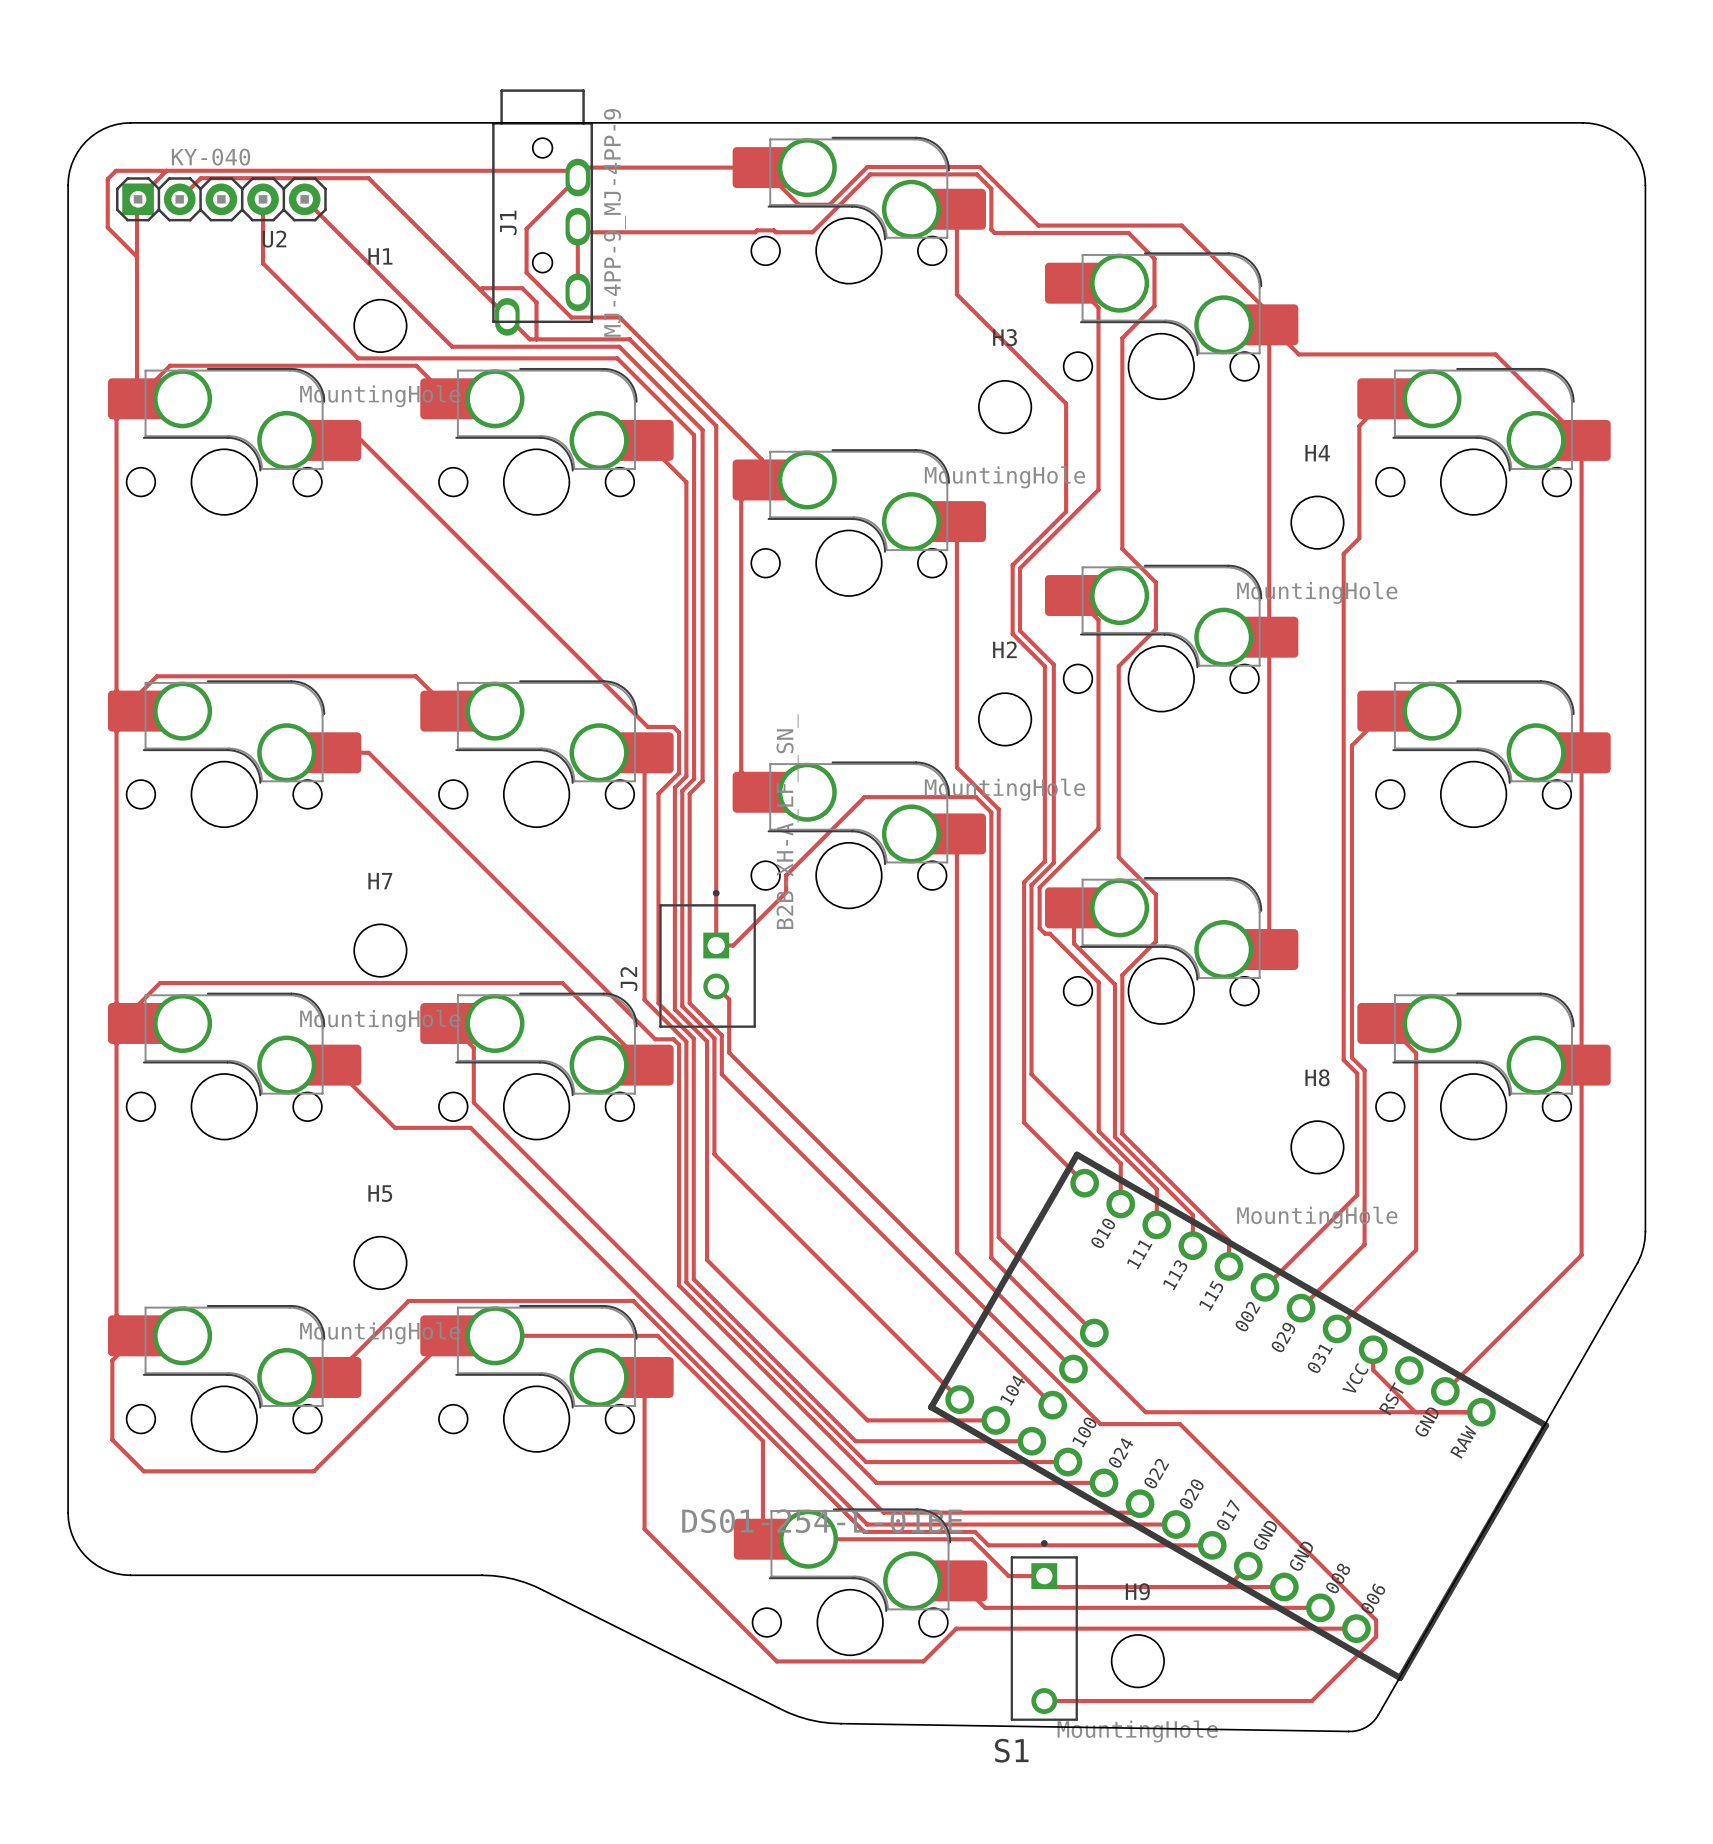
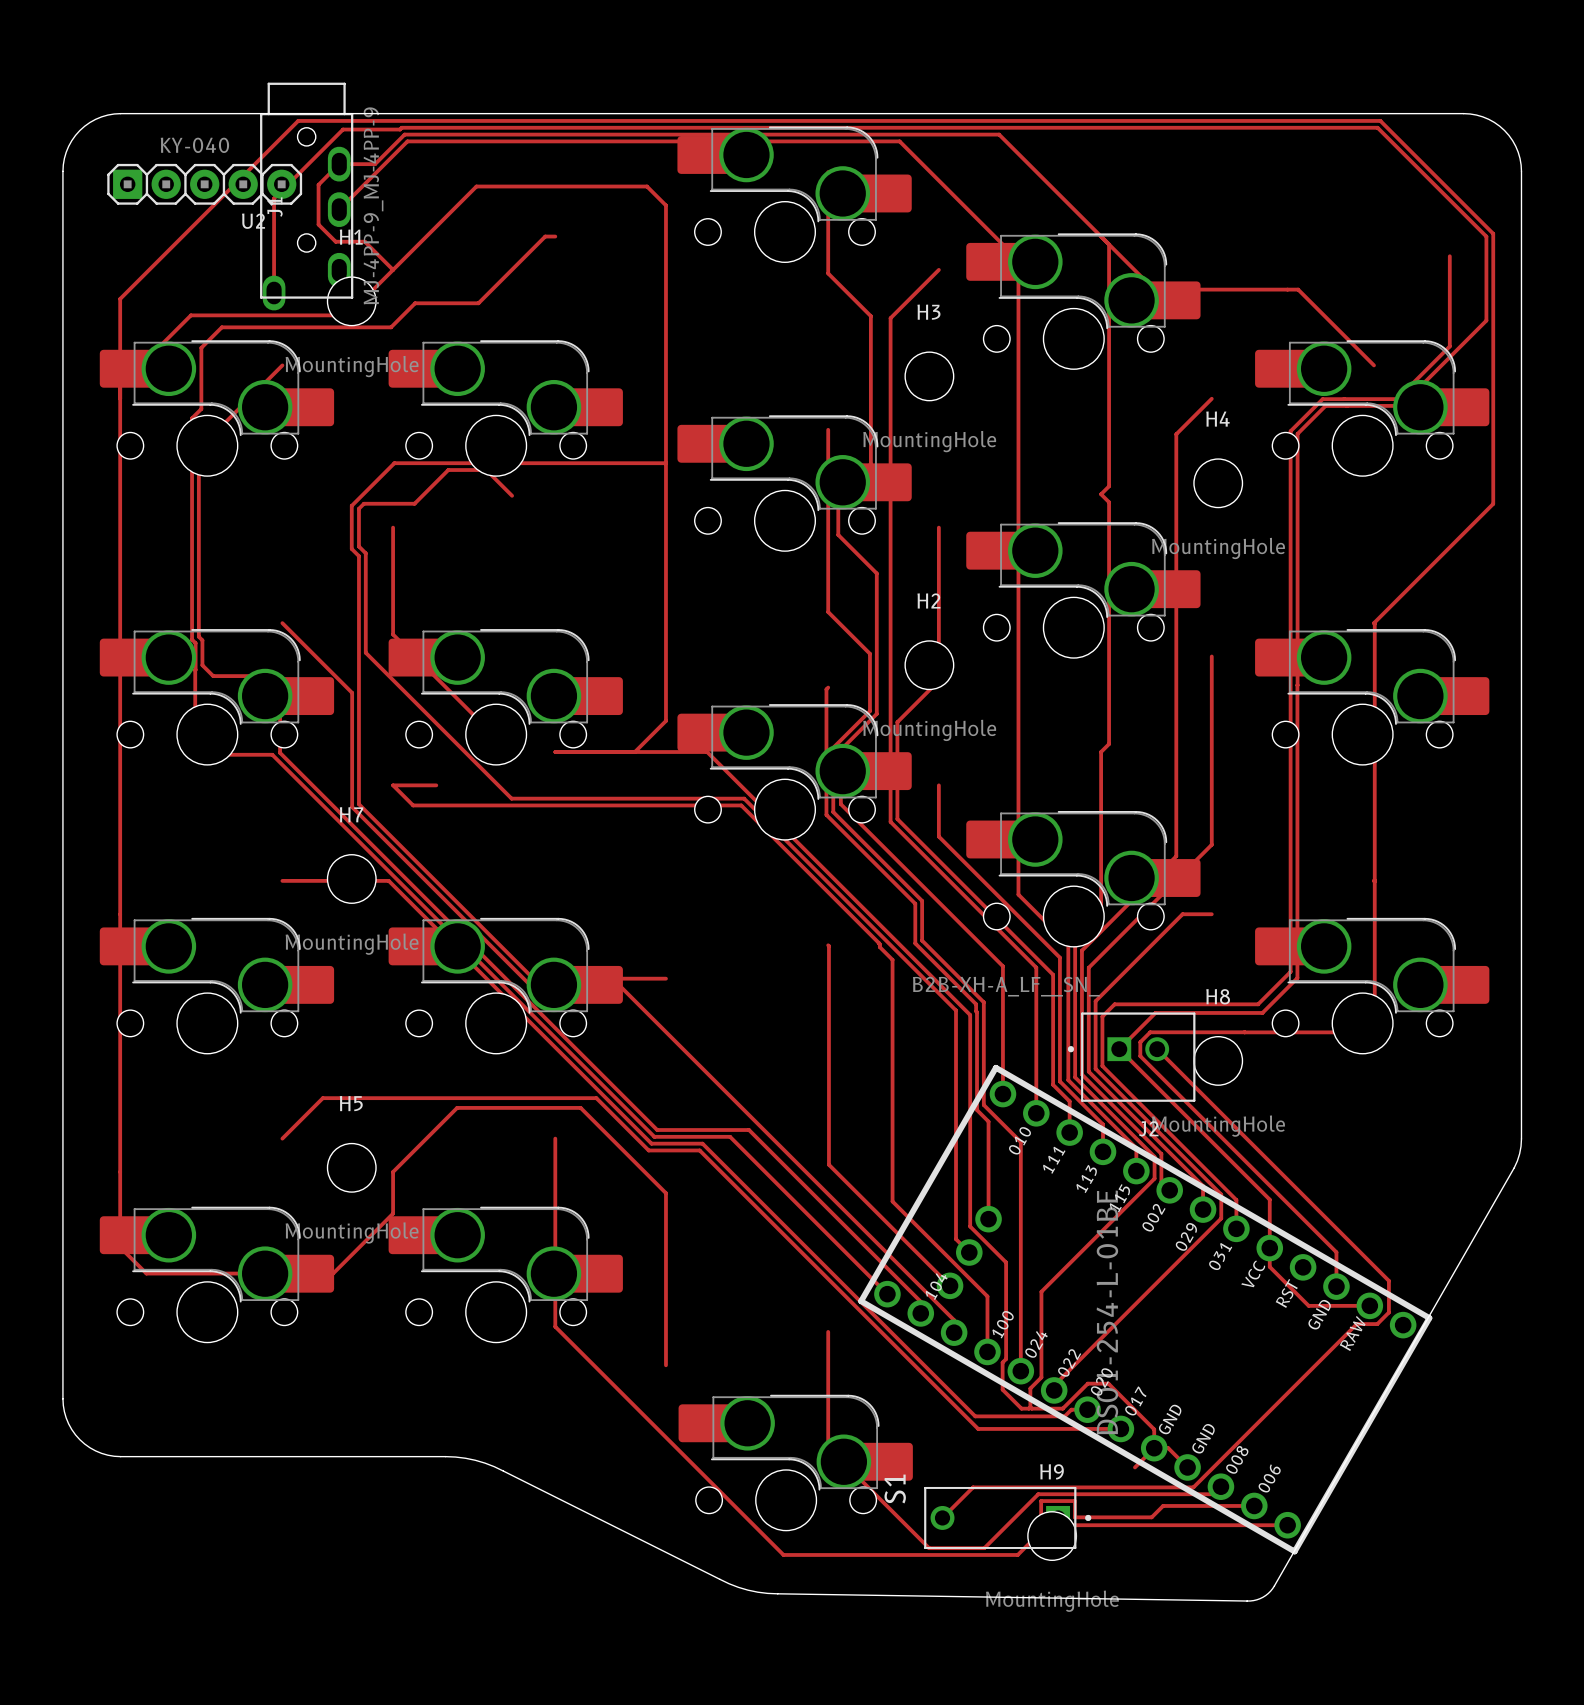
track: (166, 170) (137, 200) (137, 398) -> none
track: (577, 177) (571, 170) (116, 170) (107, 179) (107, 227) (137, 256) -> none
track: (179, 199) (200, 178) (368, 178) (529, 339) (629, 339) (716, 425) (716, 945) (733, 945) (786, 892) (786, 875) (864, 797) (976, 797) (991, 812) (991, 1257) (1145, 1412) (1415, 1412) -> none
track: (263, 199) (263, 263) (358, 358) (617, 358) (694, 435) (694, 778) (682, 790) (682, 1006) (714, 1038) (714, 1154) (789, 1229) -> (555, 236) (545, 236) (478, 303) (415, 303) (391, 327) (221, 327) (201, 347) (201, 409) (192, 418) (192, 639) (195, 643) (195, 733) (216, 754) (272, 754) (654, 1136) (730, 1136)
track: (304, 199) (452, 346) (619, 346) (702, 430) (702, 780) (689, 793) (689, 1003) (721, 1035) (721, 1074) (1052, 1405) -> none
track: (956, 209) (956, 294) (1066, 403) (1066, 511) (1012, 565) (1012, 633) (1044, 666) (1044, 861) (1024, 882) (1024, 1122) (1084, 1183) -> (828, 172) (828, 273) (870, 316) (870, 463) (838, 496) (838, 534) (876, 573) (876, 713) (840, 749) (840, 804) (1002, 966) (1002, 1094)
J1 position: (542, 212) -> (306, 196)
track: none -> (1109, 244) (1109, 486) (1101, 494) (1109, 502) (1109, 744) (1101, 752) (1101, 908) (1075, 934) (1075, 1077) (1154, 1156) (1154, 1178) (1041, 1291) (1041, 1377) (1030, 1388) (1030, 1407)
track: (1074, 283) (1098, 307) (1098, 489) (1020, 568) (1020, 630) (1053, 664) (1053, 862) (1031, 885) (1031, 1074) (1120, 1163) -> (938, 269) (890, 318) (890, 821) (1036, 967) (1036, 1075)
track: (480, 289) (482, 288) (522, 288) (536, 302) (536, 339) -> none
track: none -> (393, 269) (364, 241) (335, 241) (318, 224) (318, 184) (339, 164) (375, 164) (404, 134) (999, 134) (1154, 289) (1298, 289) (1374, 365)
track: (577, 292) (577, 226) (583, 232) (755, 232) (757, 230) (812, 232) (870, 174) (976, 174) (991, 188) (991, 229) (994, 232) (1128, 232) (1154, 258) (1154, 305) (1122, 338) (1122, 548) (1155, 582) (1155, 629) (1118, 666) (1118, 857) (1155, 894) (1155, 941) (1122, 975) (1122, 1133) (1228, 1241) -> (339, 209) (407, 141) (899, 141) (1018, 260) (1018, 894) (1068, 944) (1068, 1080) (1136, 1148)
track: none -> (274, 293) (274, 198) (343, 129) (400, 129) (401, 127) (1377, 127) (1486, 236) (1486, 320) (1401, 405) (1325, 405) (1297, 433) (1297, 685)
track: (1269, 324) (1298, 354) (1495, 354) (1581, 440) (1581, 1255) (1445, 1391) -> (665, 1365) (665, 1193) (580, 1107) (457, 1107) (393, 1171) (393, 1213) (333, 1273) (146, 1273) (120, 1247) (120, 298) (298, 120) (1380, 120) (1493, 233) (1493, 503) (1374, 623) (1374, 1029) (1372, 1032) (1150, 1032) (1140, 1042) (1140, 1056) (1336, 1252) (1336, 1286)
track: (449, 398) (416, 365) (170, 365) (116, 419) (116, 690) (137, 711) -> none
track: (1386, 398) (1359, 425) (1359, 538) (1343, 553) (1343, 1059) (1357, 1073) (1357, 1195) (1264, 1287) -> (1211, 398) (1176, 434) (1176, 856) (1081, 950) (1081, 1074) (1161, 1153) (1161, 1182) (1169, 1190)
track: none -> (120, 386) (190, 315) (347, 315) (476, 186) (647, 186) (665, 205) (665, 720) (634, 752)
track: (332, 440) (361, 440) (647, 726) (673, 726) (678, 732) (678, 773) (658, 793) (658, 1003) (693, 1038) (693, 1279) (855, 1441) (1031, 1441) -> (282, 623) (352, 692) (352, 807) (530, 985) (619, 985) (954, 1320) (954, 1332)
track: (644, 440) (686, 482) (686, 776) (674, 787) (674, 1009) (707, 1041) (707, 1259) (867, 1420) (995, 1420) -> (282, 365) (198, 448) (198, 636) (202, 640) (202, 665) (213, 676) (263, 676) (280, 692) (280, 752) (657, 1130) (749, 1130) (920, 1301) (920, 1313)
track: none -> (665, 463) (394, 463) (351, 505) (351, 548) (358, 556) (358, 804) (533, 978) (665, 978)
track: (956, 521) (956, 767) (998, 809) (998, 1237) (1094, 1333) -> none
track: none -> (512, 495) (486, 470) (448, 470) (414, 503) (363, 503) (358, 508) (358, 546) (365, 553) (365, 652) (511, 798) (744, 798) (956, 1010) (956, 1239) (969, 1252)
track: none -> (393, 527) (393, 634) (512, 753)
track: (1074, 595) (1098, 619) (1098, 828) (1039, 887) (1039, 928) (1045, 933) (1049, 933) (1098, 982) (1098, 1131) (1156, 1191) -> (938, 527) (938, 680) (897, 722) (897, 819) (1053, 974) (1053, 1084) (1069, 1101)
track: (137, 711) (137, 696) (156, 676) (415, 676) (449, 711) -> none
track: (137, 711) (116, 731) (116, 1002) (137, 1023) -> none
track: (1386, 711) (1351, 745) (1351, 1057) (1364, 1070) (1364, 1244) (1301, 1308) -> (1211, 656) (1211, 844) (1088, 967) (1088, 1071) (1203, 1185) (1203, 1209)
track: none -> (1297, 685) (1297, 978) (1262, 1012) (1155, 1012) (1119, 1049) (1269, 1199) (1269, 1248)
track: none -> (828, 687) (826, 689) (826, 814) (915, 903) (915, 943) (976, 1004) (977, 1110) (988, 1121) (988, 1219)
track: (332, 752) (368, 752) (655, 1039) (673, 1039) (678, 1044) (678, 1285) (876, 1482) (1103, 1482) -> (828, 429) (828, 612) (869, 653) (869, 711) (833, 747) (833, 812) (922, 900) (922, 940) (983, 1002) (983, 1105) (1020, 1142) (1020, 1371)
track: (644, 752) (644, 999) (686, 1041) (686, 1282) (866, 1462) (1067, 1462) -> (878, 943) (879, 947) (892, 959) (892, 1201) (987, 1296) (987, 1351)
track: (761, 792) (741, 771) (741, 500) (761, 479) (761, 459) (619, 317) (571, 317) (526, 272) (526, 228) (587, 167) (761, 167) (798, 204) (829, 204) (867, 167) (979, 167) (1038, 225) (1181, 225) (1269, 313) (1269, 949) -> none
track: none -> (555, 752) (707, 752) (970, 1015) (970, 1226) (1006, 1262) (1006, 1359) (1002, 1362) (1002, 1389) (1021, 1408) (1030, 1407)
track: (956, 833) (956, 1252) (1073, 1369) -> none
track: none -> (436, 785) (393, 785) (413, 805) (741, 805) (878, 942)
track: (1074, 907) (1074, 943) (1114, 984) (1114, 1136) (1192, 1216) -> (938, 785) (938, 836) (1059, 957) (1059, 1081) (1103, 1124)
J2 rotation: 0° (707, 958) -> 90° counterclockwise (1131, 1057)
J2 position: (707, 958) -> (1131, 1057)
track: (716, 986) (729, 999) (729, 1052) (1100, 1424) (1180, 1424) (1376, 1620) (1376, 1636) (1311, 1701) (1044, 1701) -> none
track: none -> (828, 945) (828, 1164) (950, 1285)
track: (137, 1023) (137, 1006) (160, 982) (562, 982) (644, 1065) -> none
track: (137, 1023) (116, 1043) (116, 1315) (137, 1335) (112, 1360) (112, 1439) (143, 1471) (313, 1471) (449, 1335) (657, 1335) (762, 1440) (762, 1539) -> none
track: (449, 1023) (473, 1047) (473, 1102) (883, 1512) (1131, 1512) (1140, 1503) -> (1211, 914) (1182, 914) (1095, 1001) (1095, 1068) (1221, 1194) (1221, 1218) (1054, 1385) (1054, 1390)
track: (1386, 1023) (1416, 1053) (1416, 1249) (1337, 1328) -> (1449, 256) (1449, 346) (1397, 399) (1322, 399) (1290, 431) (1290, 971) (1258, 1004) (1114, 1004) (1102, 1016) (1102, 1066) (1236, 1200) (1236, 1228)
track: (332, 1065) (394, 1127) (470, 1127) (867, 1524) (1158, 1524) -> (282, 880) (388, 880) (651, 1143) (702, 1143) (975, 1416) (1064, 1416) (1071, 1409)
track: none -> (1157, 1049) (1388, 1280) (1388, 1312) (1377, 1324) (1356, 1324) (1193, 1487) (973, 1487) (942, 1517)
part footprint: [928, 1151, 1550, 1682] -> [858, 1064, 1433, 1555]
track: (332, 1377) (408, 1300) (633, 1300) (864, 1531) (975, 1531) (988, 1545) (1057, 1545) -> (282, 1138) (322, 1098) (596, 1098) (648, 1150) (699, 1150) (978, 1428)
track: (644, 1377) (644, 1529) (776, 1661) (923, 1661) (956, 1628) (1257, 1628) -> (555, 1138) (555, 1326) (783, 1554) (1017, 1554) (1041, 1531) (1041, 1501) (1074, 1501) (1074, 1517) (1151, 1517) (1163, 1505)
track: (763, 1539) (971, 1539) (1008, 1576) (1044, 1576) (1055, 1586) (1284, 1586) -> (1030, 1407) (1062, 1408) (1087, 1383) (1108, 1383) (1154, 1429) (1154, 1448) (1168, 1448) (1187, 1467)
track: (958, 1580) (985, 1607) (1320, 1607) -> (828, 1331) (828, 1447) (929, 1548) (984, 1548) (1038, 1494) (1213, 1494) (1220, 1486)
S1 rotation: 0° (1044, 1630) -> 90° clockwise (1007, 1517)
track: none -> (1058, 1517) (1065, 1525) (1287, 1525)

